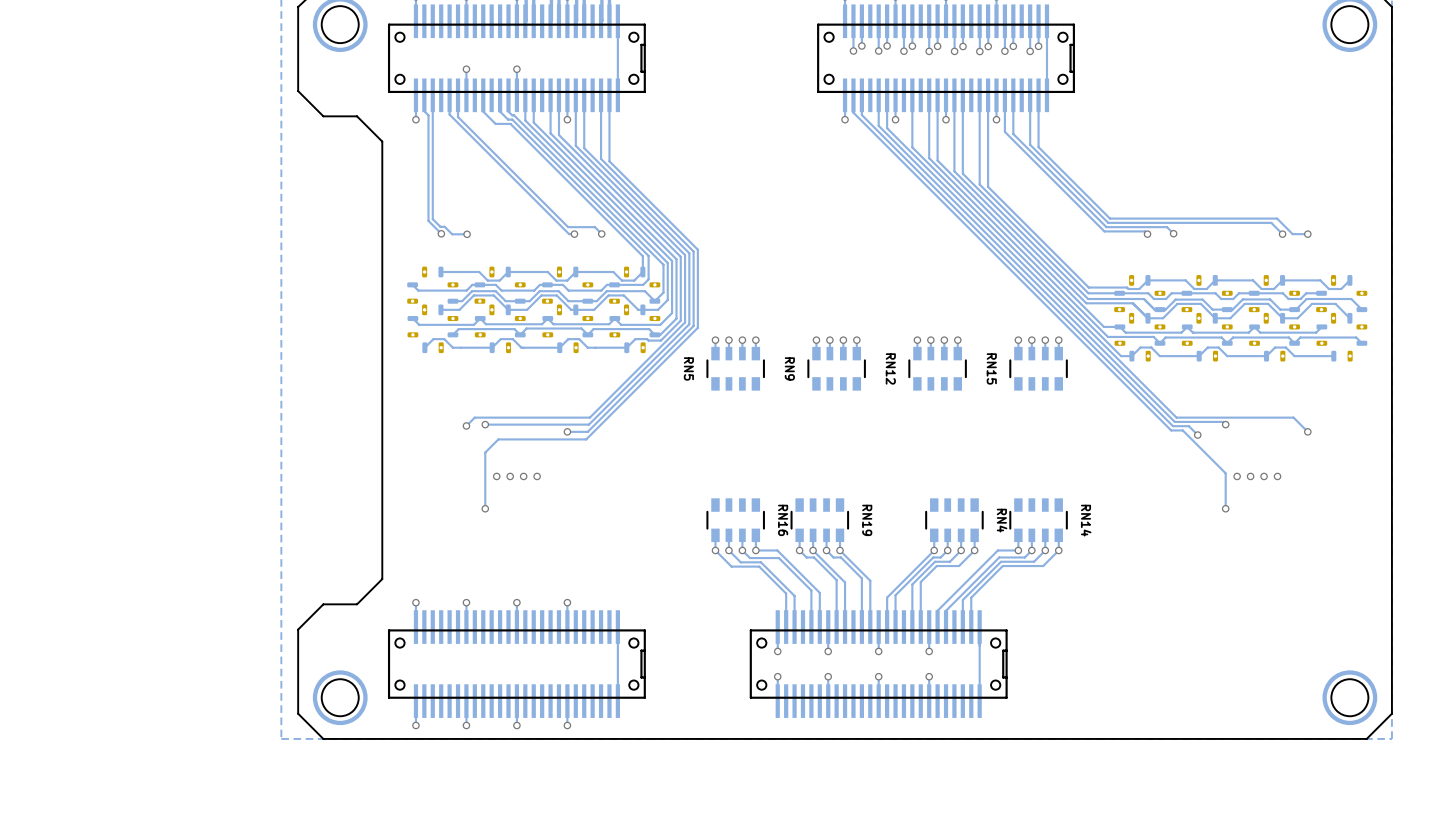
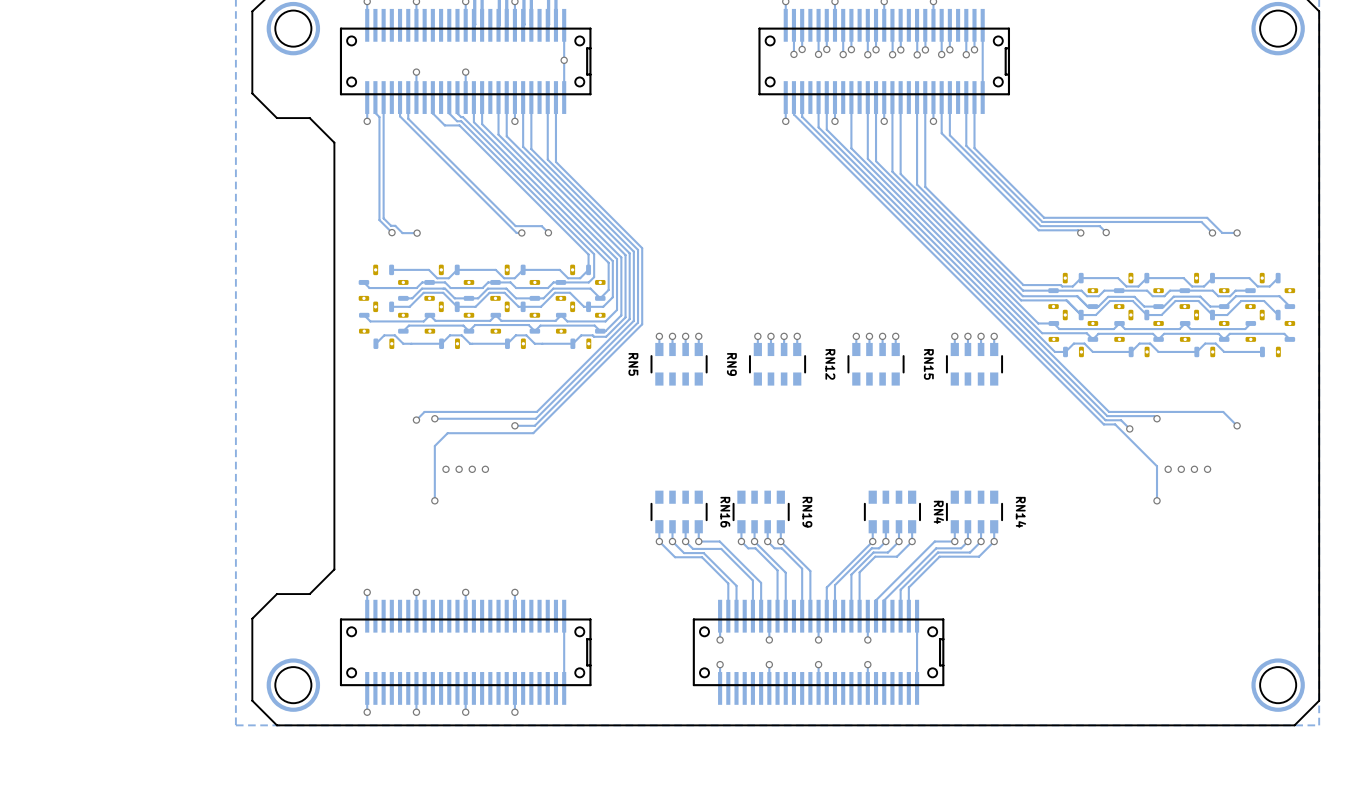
via: none -> (564, 60)

